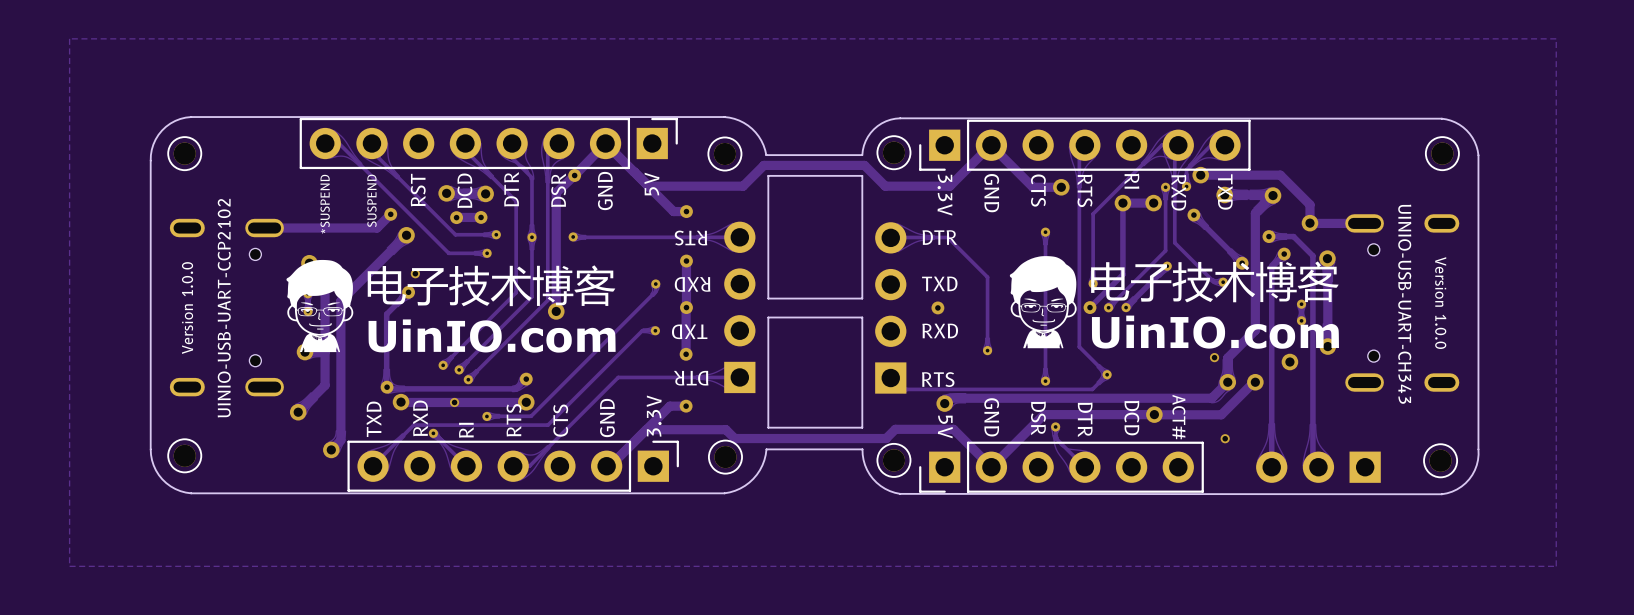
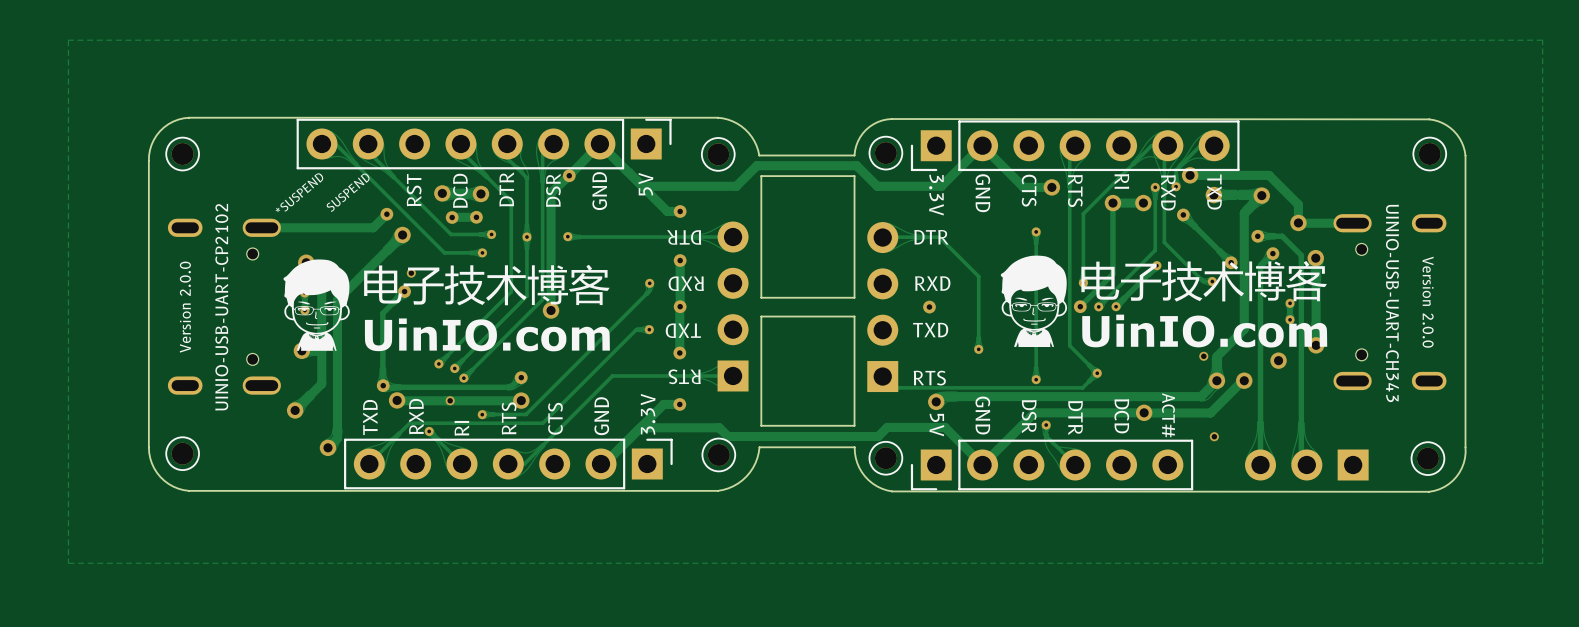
text rotation: 0° (371, 200) -> 50° clockwise (348, 192)
text rotation: 0° (325, 204) -> 50° clockwise (299, 192)
text: RTS (691, 238) -> DTR (684, 237)
text: TXD (939, 283) -> RXD (932, 283)
text: Version 1.0.0 (1440, 303) -> Version 2.0.0 (1428, 302)
text: Version 1.0.0 (187, 308) -> Version 2.0.0 (185, 307)
text: UINIO-USB-UART-CCP2102 (224, 308) -> UINIO-USB-UART-CP2102 (221, 307)
text: RXD (940, 330) -> TXD (930, 330)
text: DTR (691, 378) -> RTS (684, 376)

